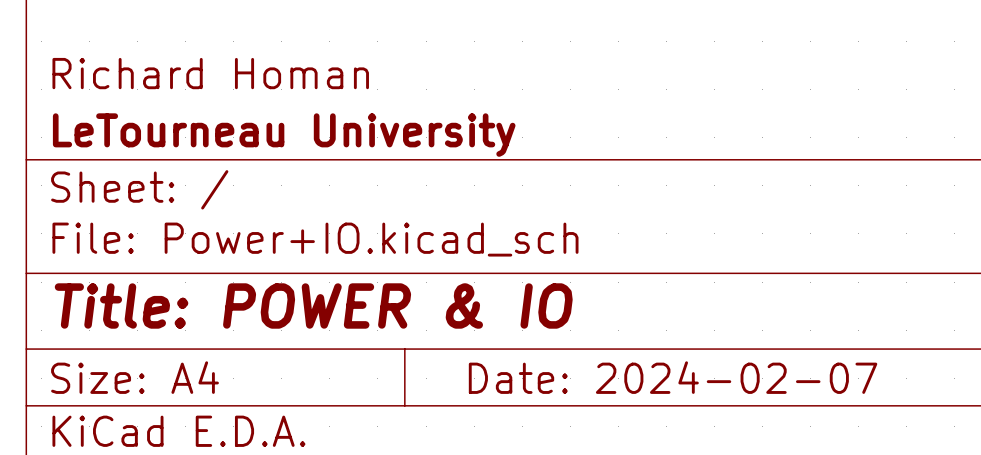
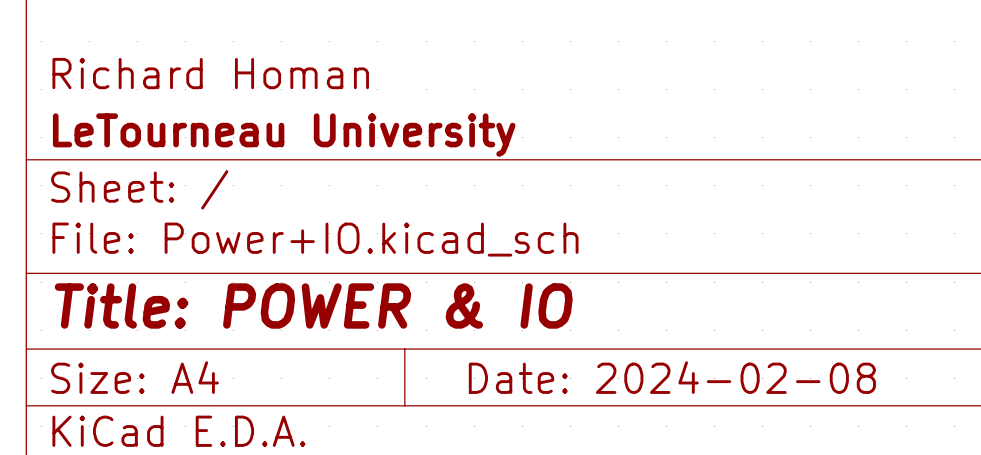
title block: Date: 2024-02-07 (673, 377) -> Date: 2024-02-08 (672, 377)

